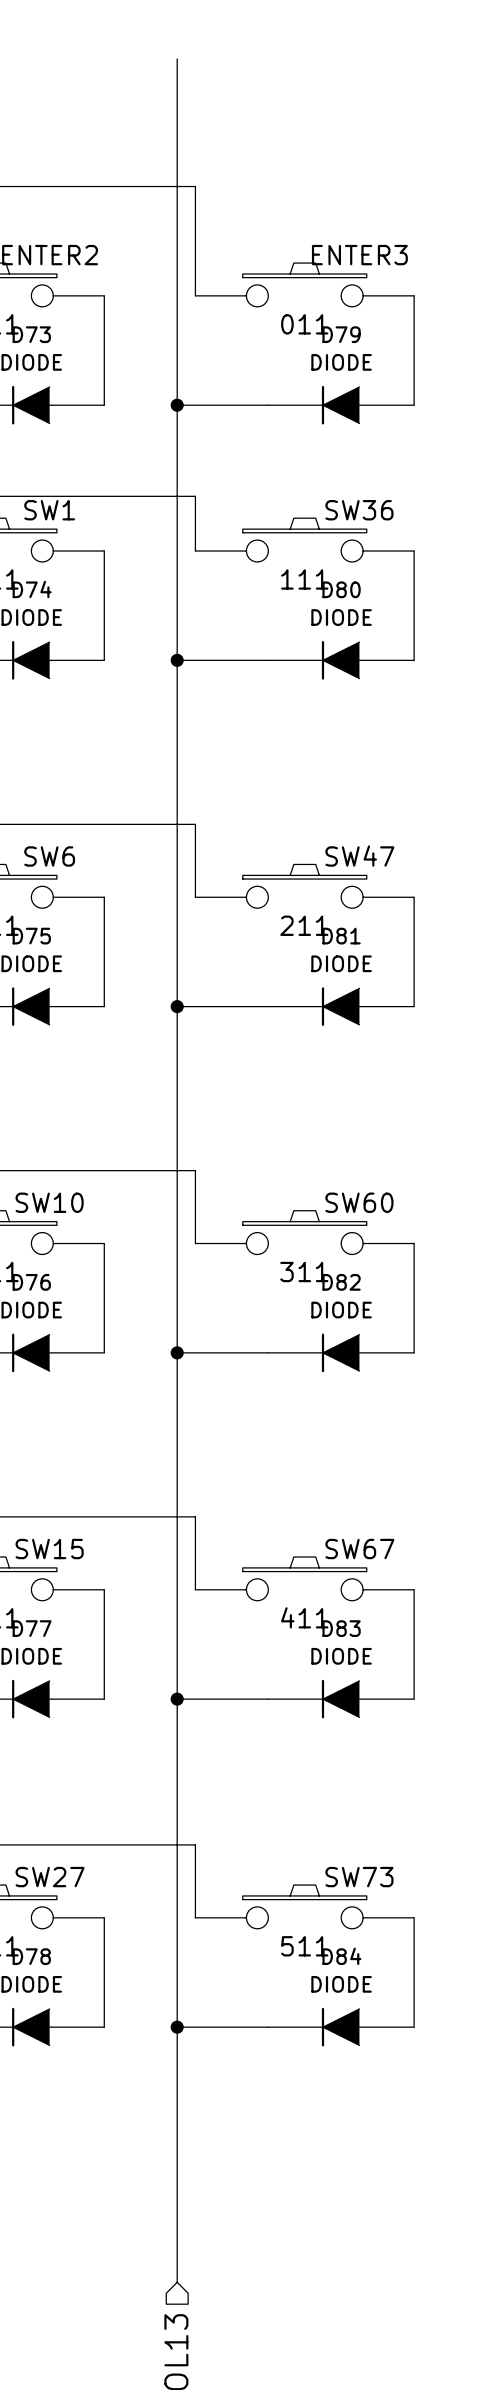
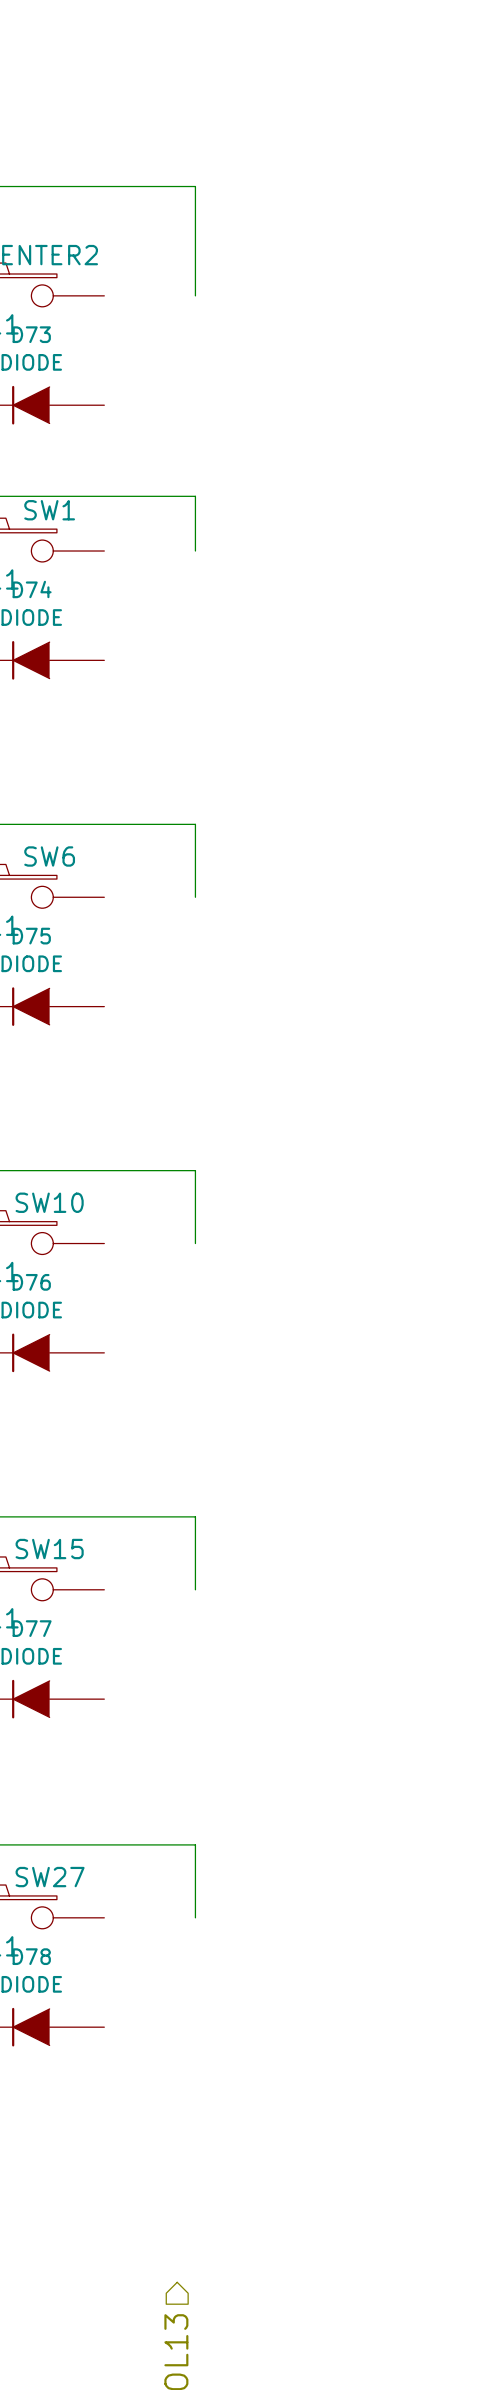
wire: (177, 58) (177, 2282) -> none
ENTER3: 011 (304, 284) -> none
wire: (104, 295) (104, 405) -> none
wire: (414, 295) (414, 405) -> none
wire: (177, 405) (268, 405) -> none
junction: (177, 405) -> none
D79: DIODE (341, 405) -> none
SW36: 111 (304, 540) -> none
wire: (104, 551) (104, 660) -> none
wire: (414, 551) (414, 660) -> none
wire: (177, 660) (268, 660) -> none
junction: (177, 660) -> none
D80: DIODE (341, 660) -> none
SW47: 211 (304, 886) -> none
wire: (104, 897) (104, 1006) -> none
wire: (414, 897) (414, 1006) -> none
wire: (177, 1006) (268, 1006) -> none
junction: (177, 1006) -> none
D81: DIODE (341, 1006) -> none
SW60: 311 (304, 1232) -> none
wire: (104, 1243) (104, 1352) -> none
wire: (414, 1243) (414, 1352) -> none
wire: (177, 1352) (268, 1352) -> none
junction: (177, 1352) -> none
D82: DIODE (341, 1352) -> none
SW67: 411 (304, 1578) -> none
wire: (104, 1589) (104, 1699) -> none
wire: (414, 1589) (414, 1699) -> none
wire: (177, 1699) (268, 1699) -> none
junction: (177, 1699) -> none
D83: DIODE (341, 1699) -> none
SW73: 511 (304, 1906) -> none
wire: (104, 1917) (104, 2027) -> none
wire: (414, 1917) (414, 2027) -> none
wire: (177, 2027) (268, 2027) -> none
junction: (177, 2027) -> none
D84: DIODE (341, 2027) -> none

